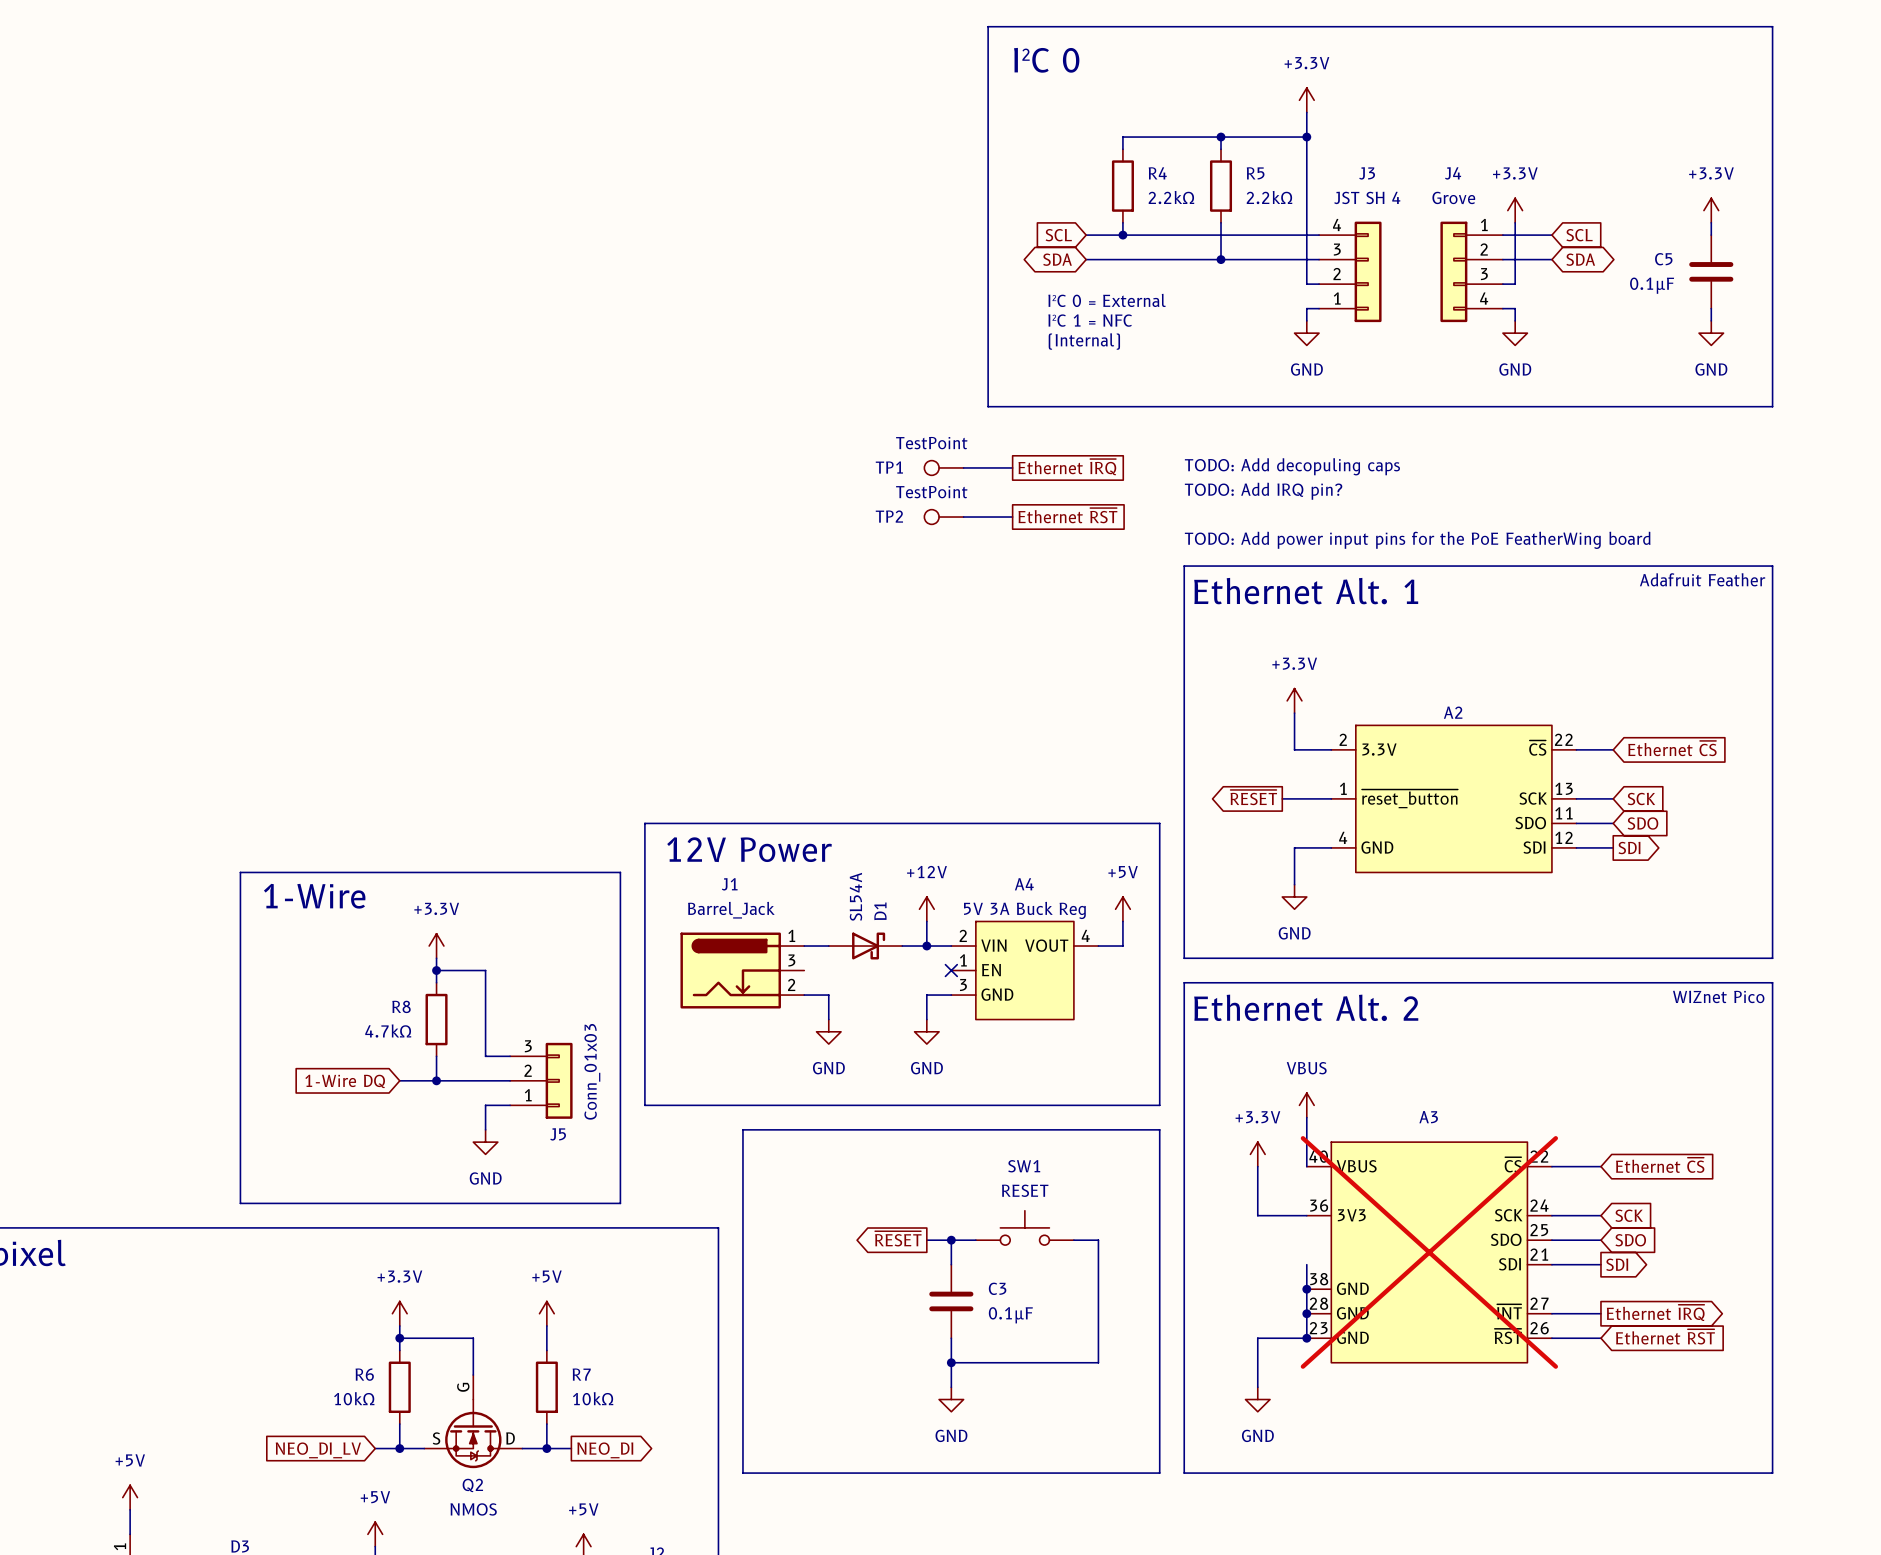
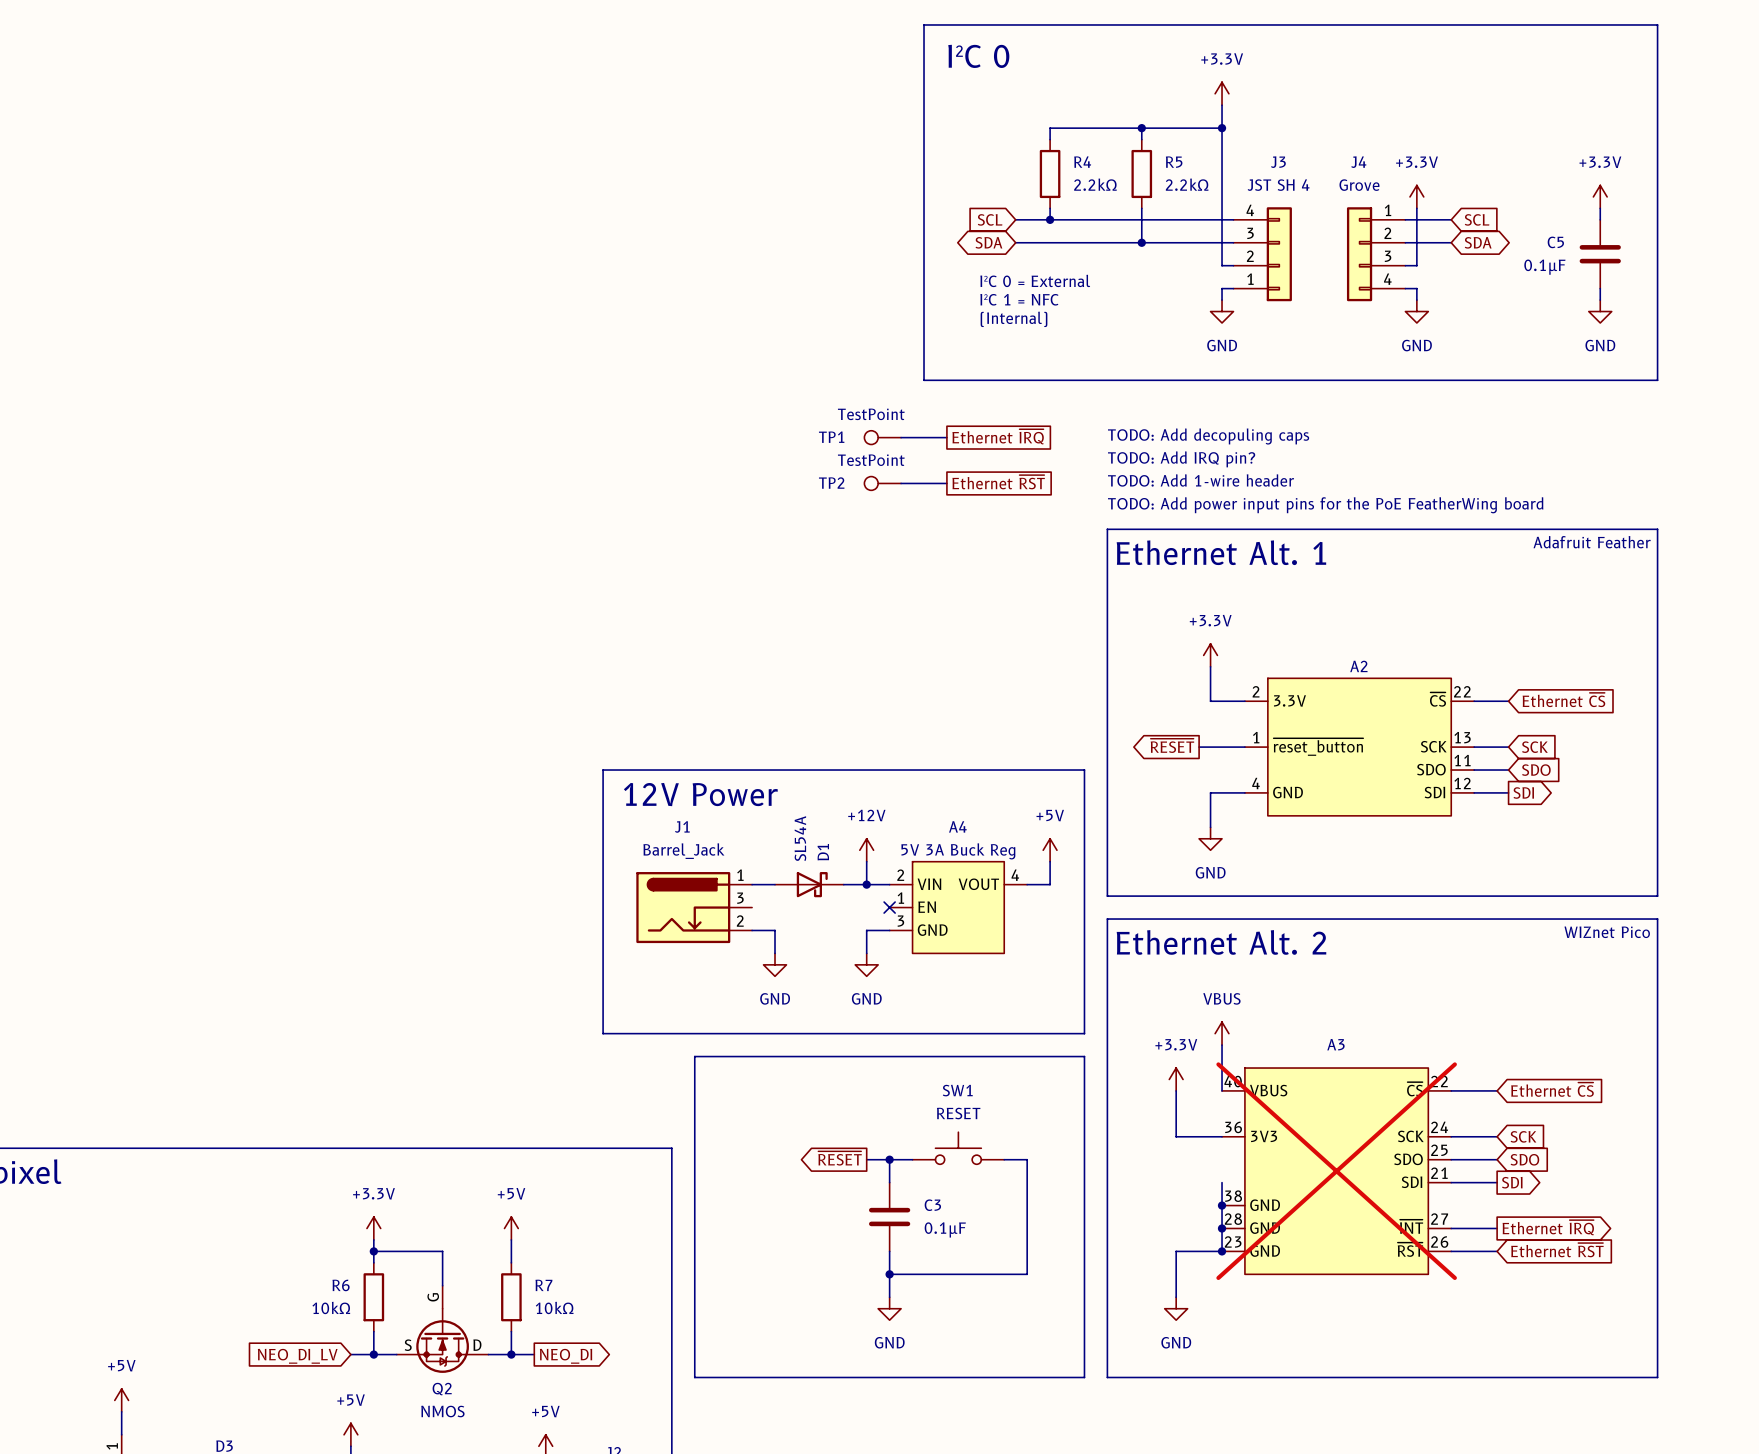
text: none -> TODO: Add 1-wire header (1201, 480)
line: (240, 872) (620, 872) (620, 1203) (240, 1203) (240, 872) -> none
text: 1-Wire (314, 896) -> none
power symbol: +3.3V (436, 946) -> none
wire: (436, 958) (436, 982) -> none
wire: (436, 970) (485, 970) (485, 1056) (510, 1056) -> none
junction: (436, 970) -> none
R8: 4.7kΩ (436, 1019) -> none
wire: (436, 1056) (436, 1080) -> none
wire: (399, 1080) (510, 1080) -> none
junction: (436, 1080) -> none
J5: Conn_01x03 (541, 1080) -> none
global label: 1-Wire DQ (345, 1081) -> none
wire: (510, 1105) (485, 1105) (485, 1129) -> none
power symbol: GND (485, 1142) -> none

